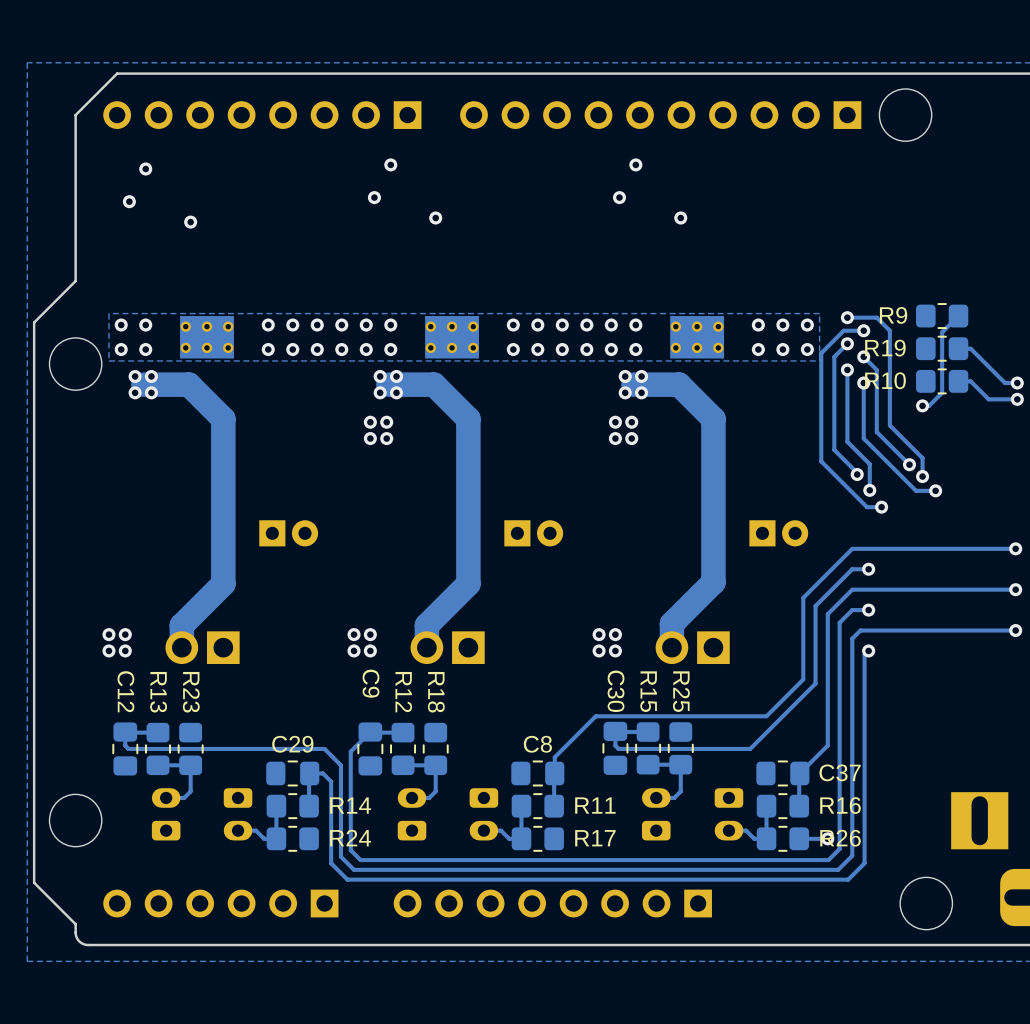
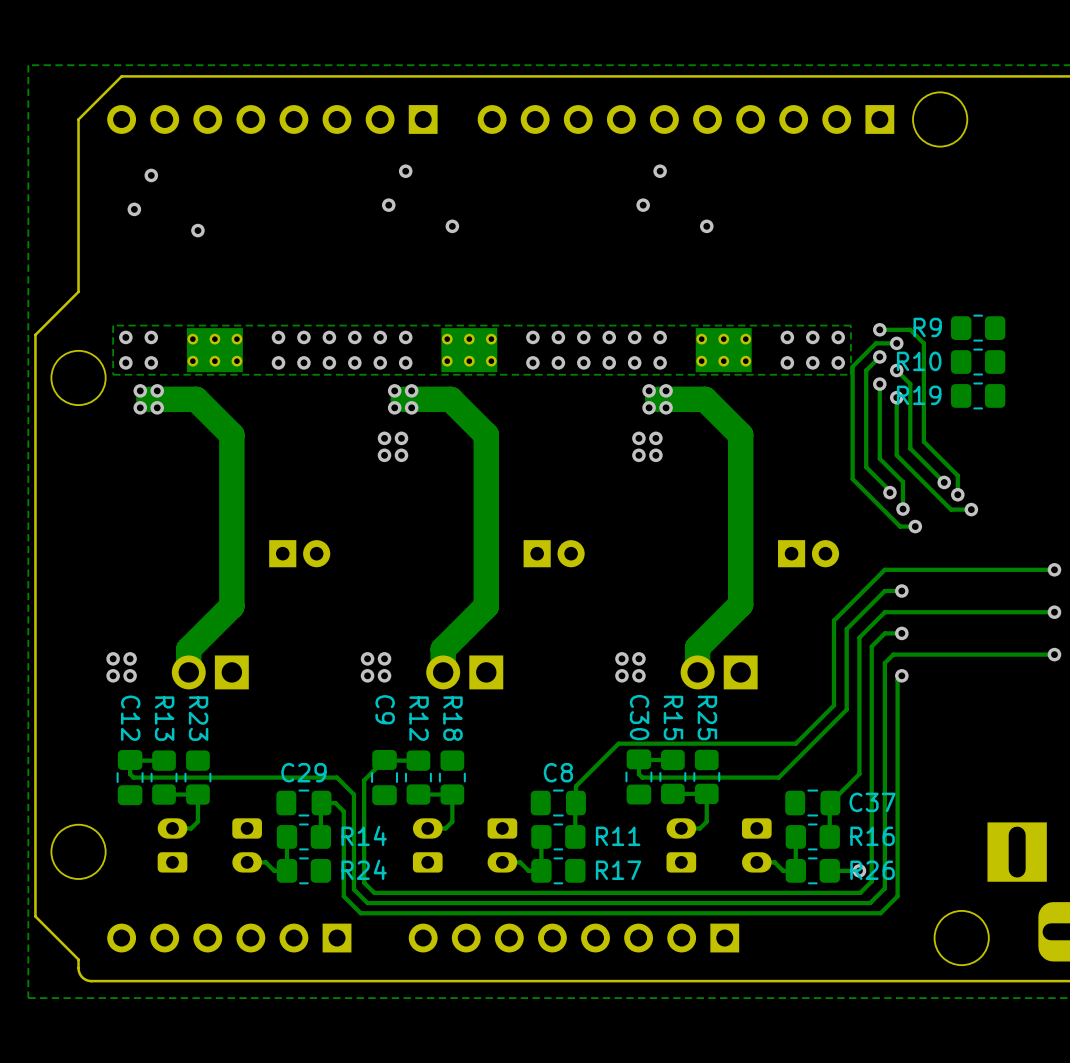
track: (958, 316) (942, 332) (942, 392) (929, 405) (922, 405) -> none
R19 name: R19 (885, 348) -> R10 (919, 361)
track: (958, 348) (970, 348) (1005, 383) (1017, 383) -> none
R10 name: R10 (885, 380) -> R19 (919, 395)
track: (958, 381) (970, 381) (988, 399) (1017, 399) -> none
via: (1017, 383) -> none
via: (1017, 399) -> none
via: (922, 405) -> none

